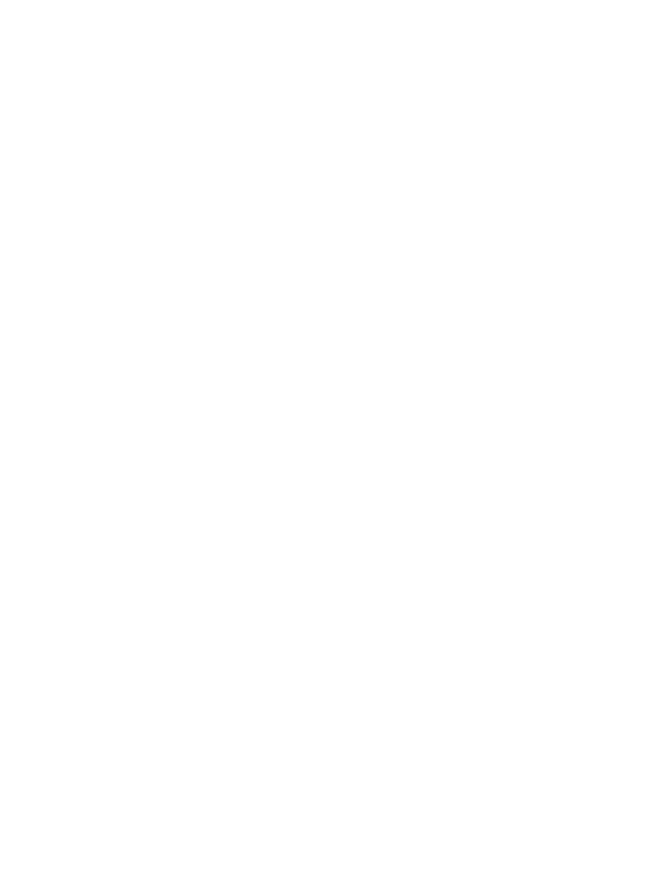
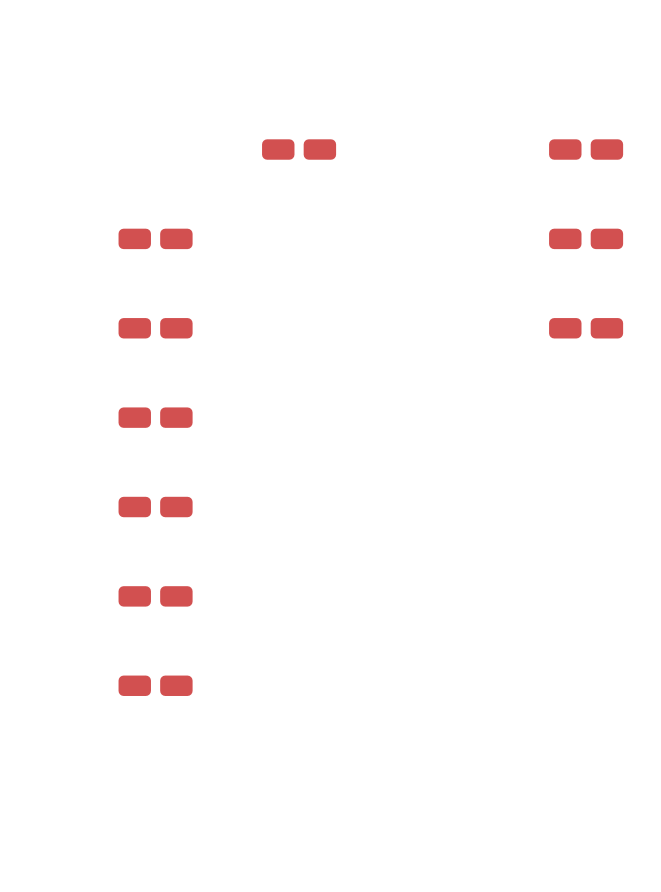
part: none -> (299, 149)
part: none -> (586, 149)
part: none -> (155, 238)
part: none -> (586, 238)
part: none -> (155, 328)
part: none -> (586, 328)
part: none -> (155, 417)
part: none -> (155, 507)
part: none -> (155, 596)
part: none -> (155, 685)

